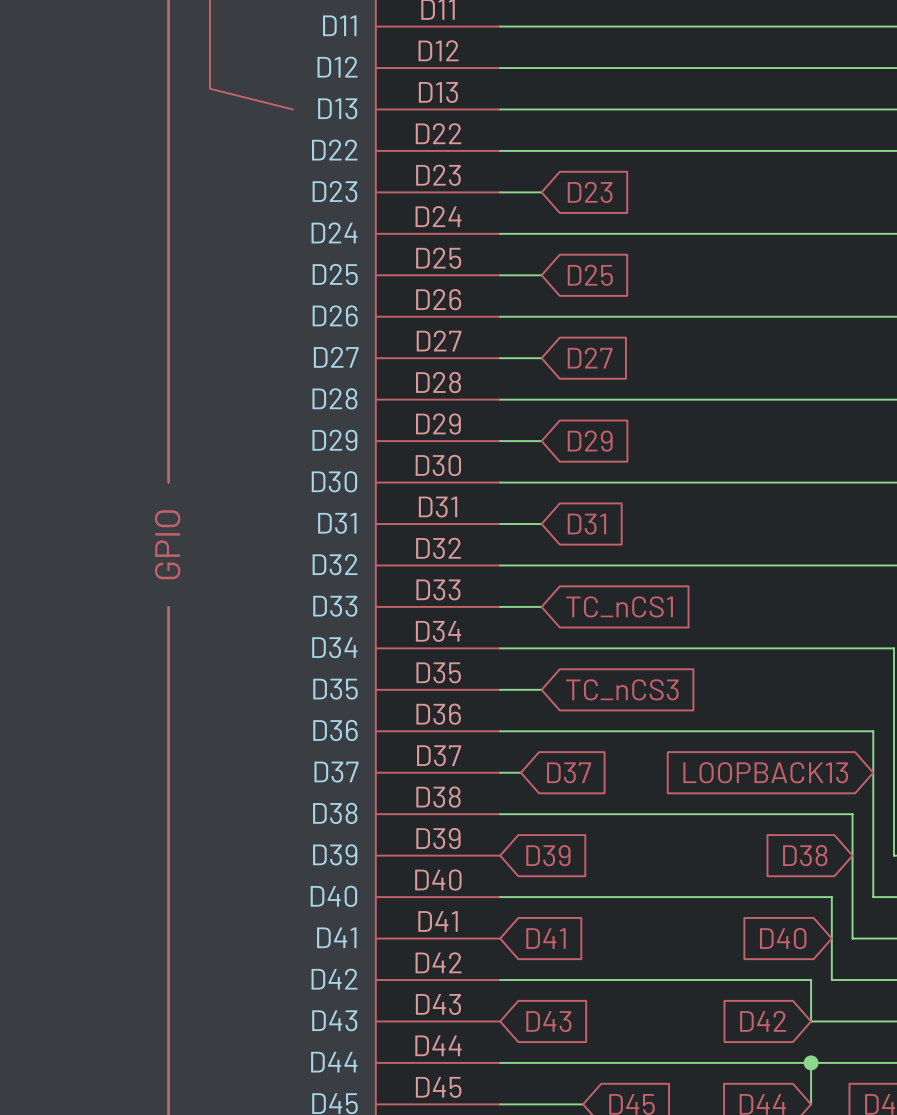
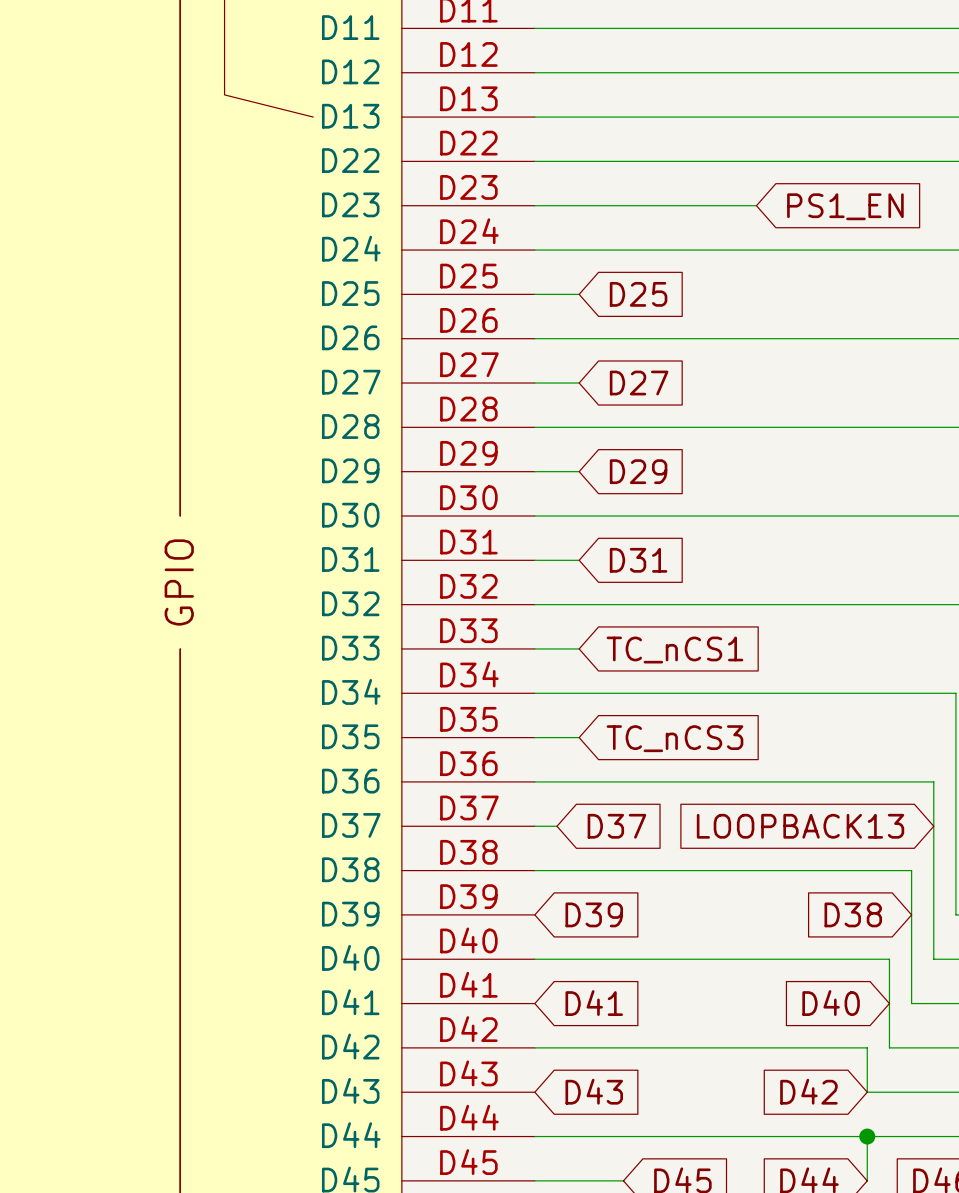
wire: none -> (579, 205) (756, 205)
global label: D23 (590, 192) -> none
global label: none -> PS1_EN (845, 206)

